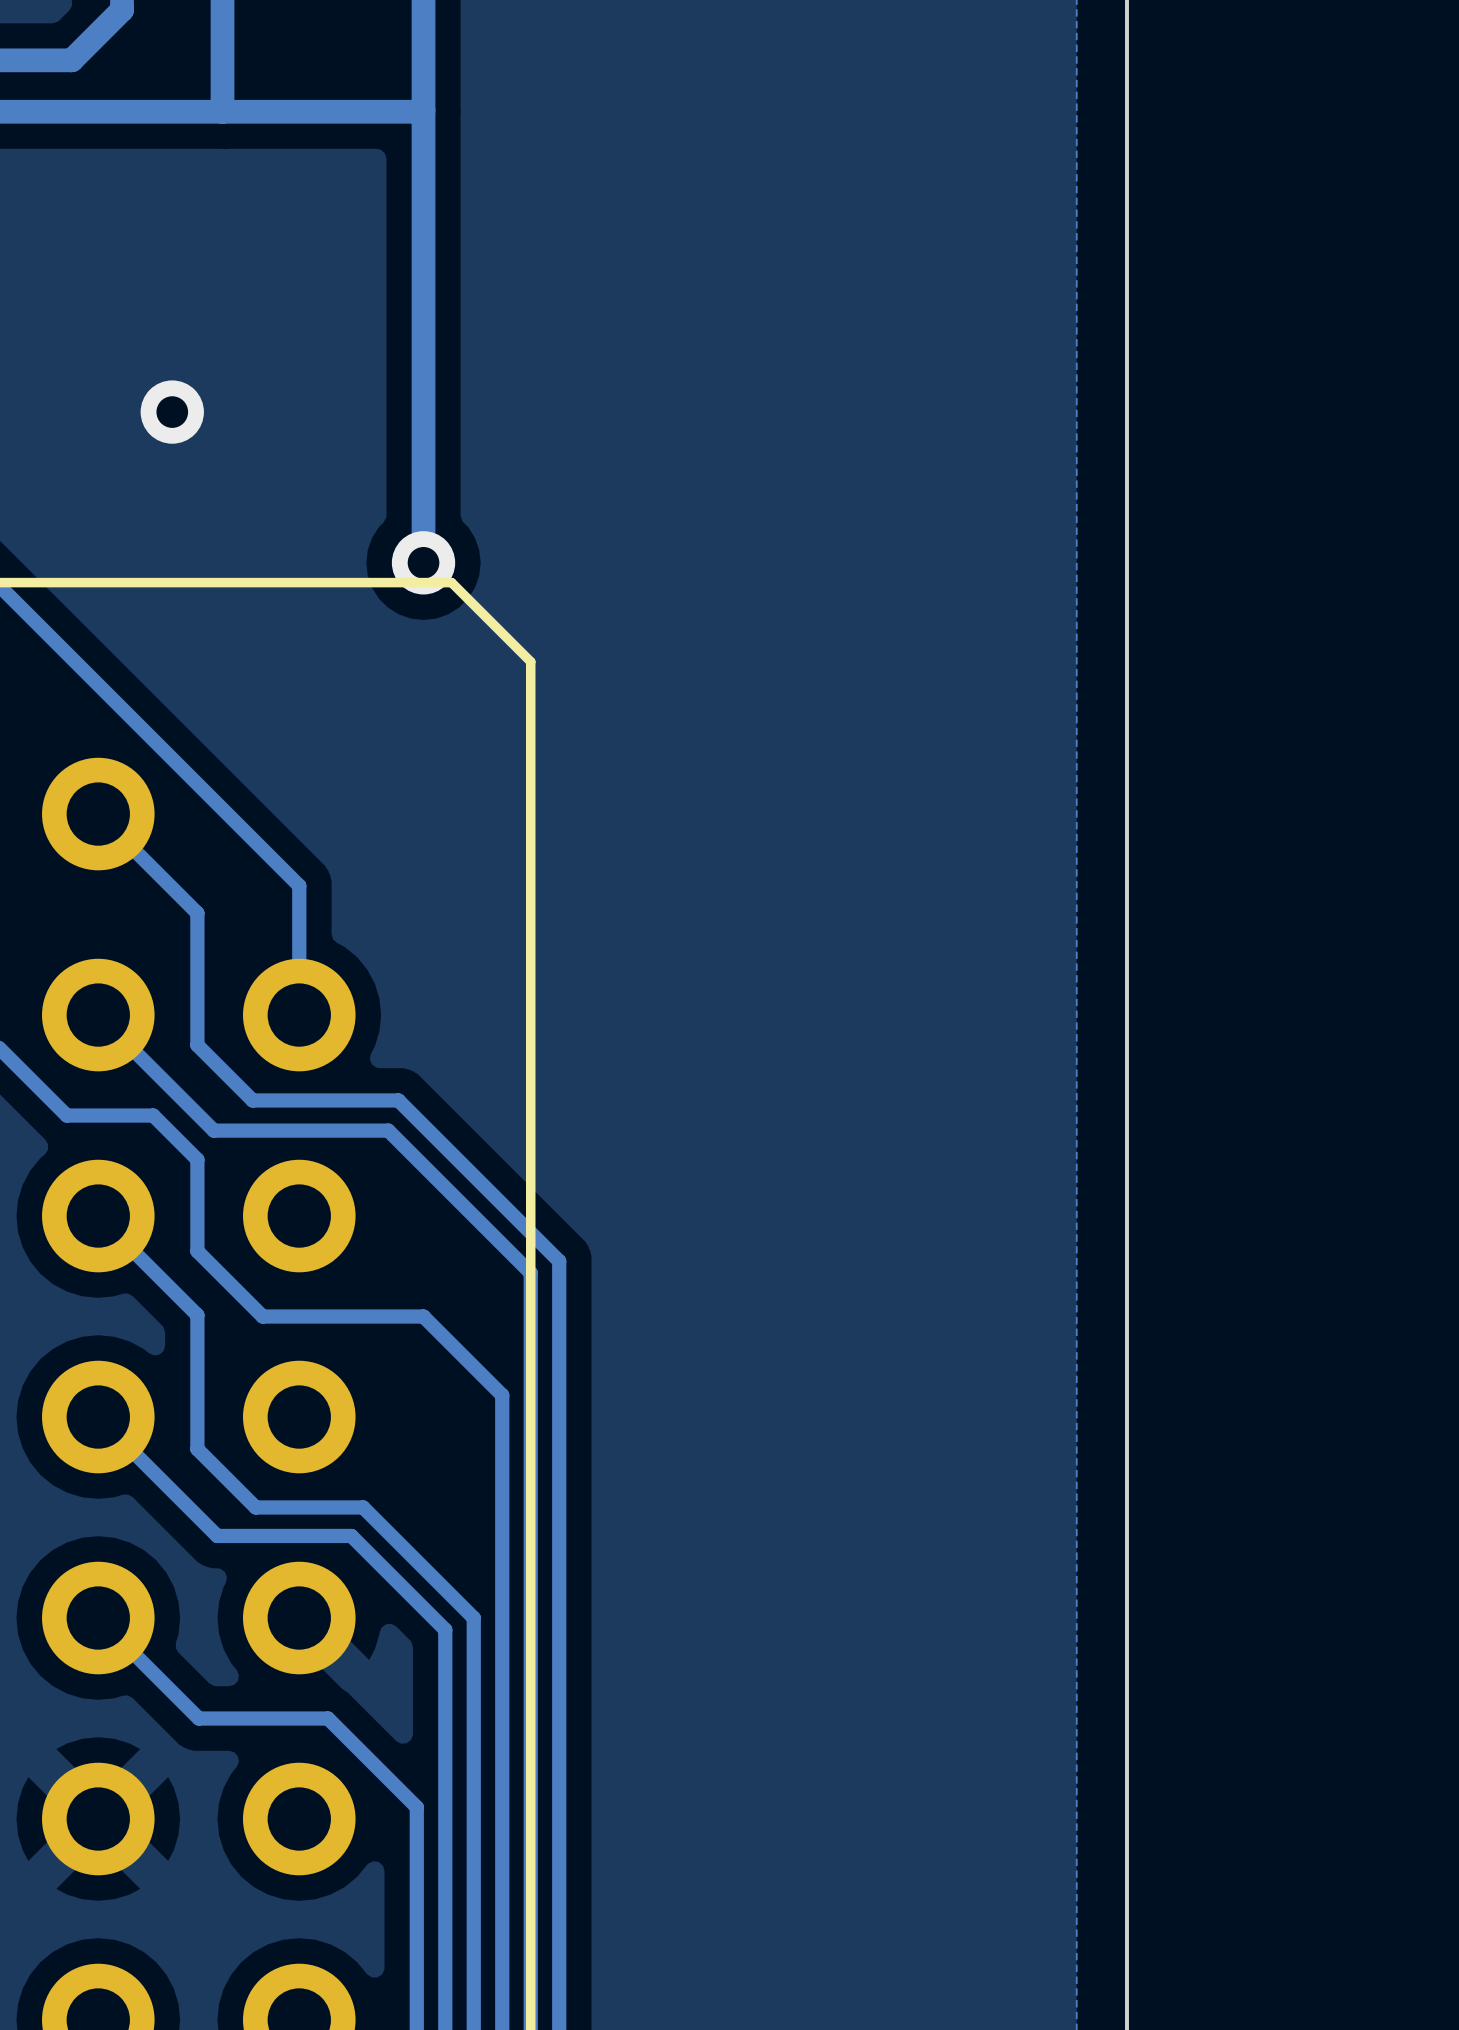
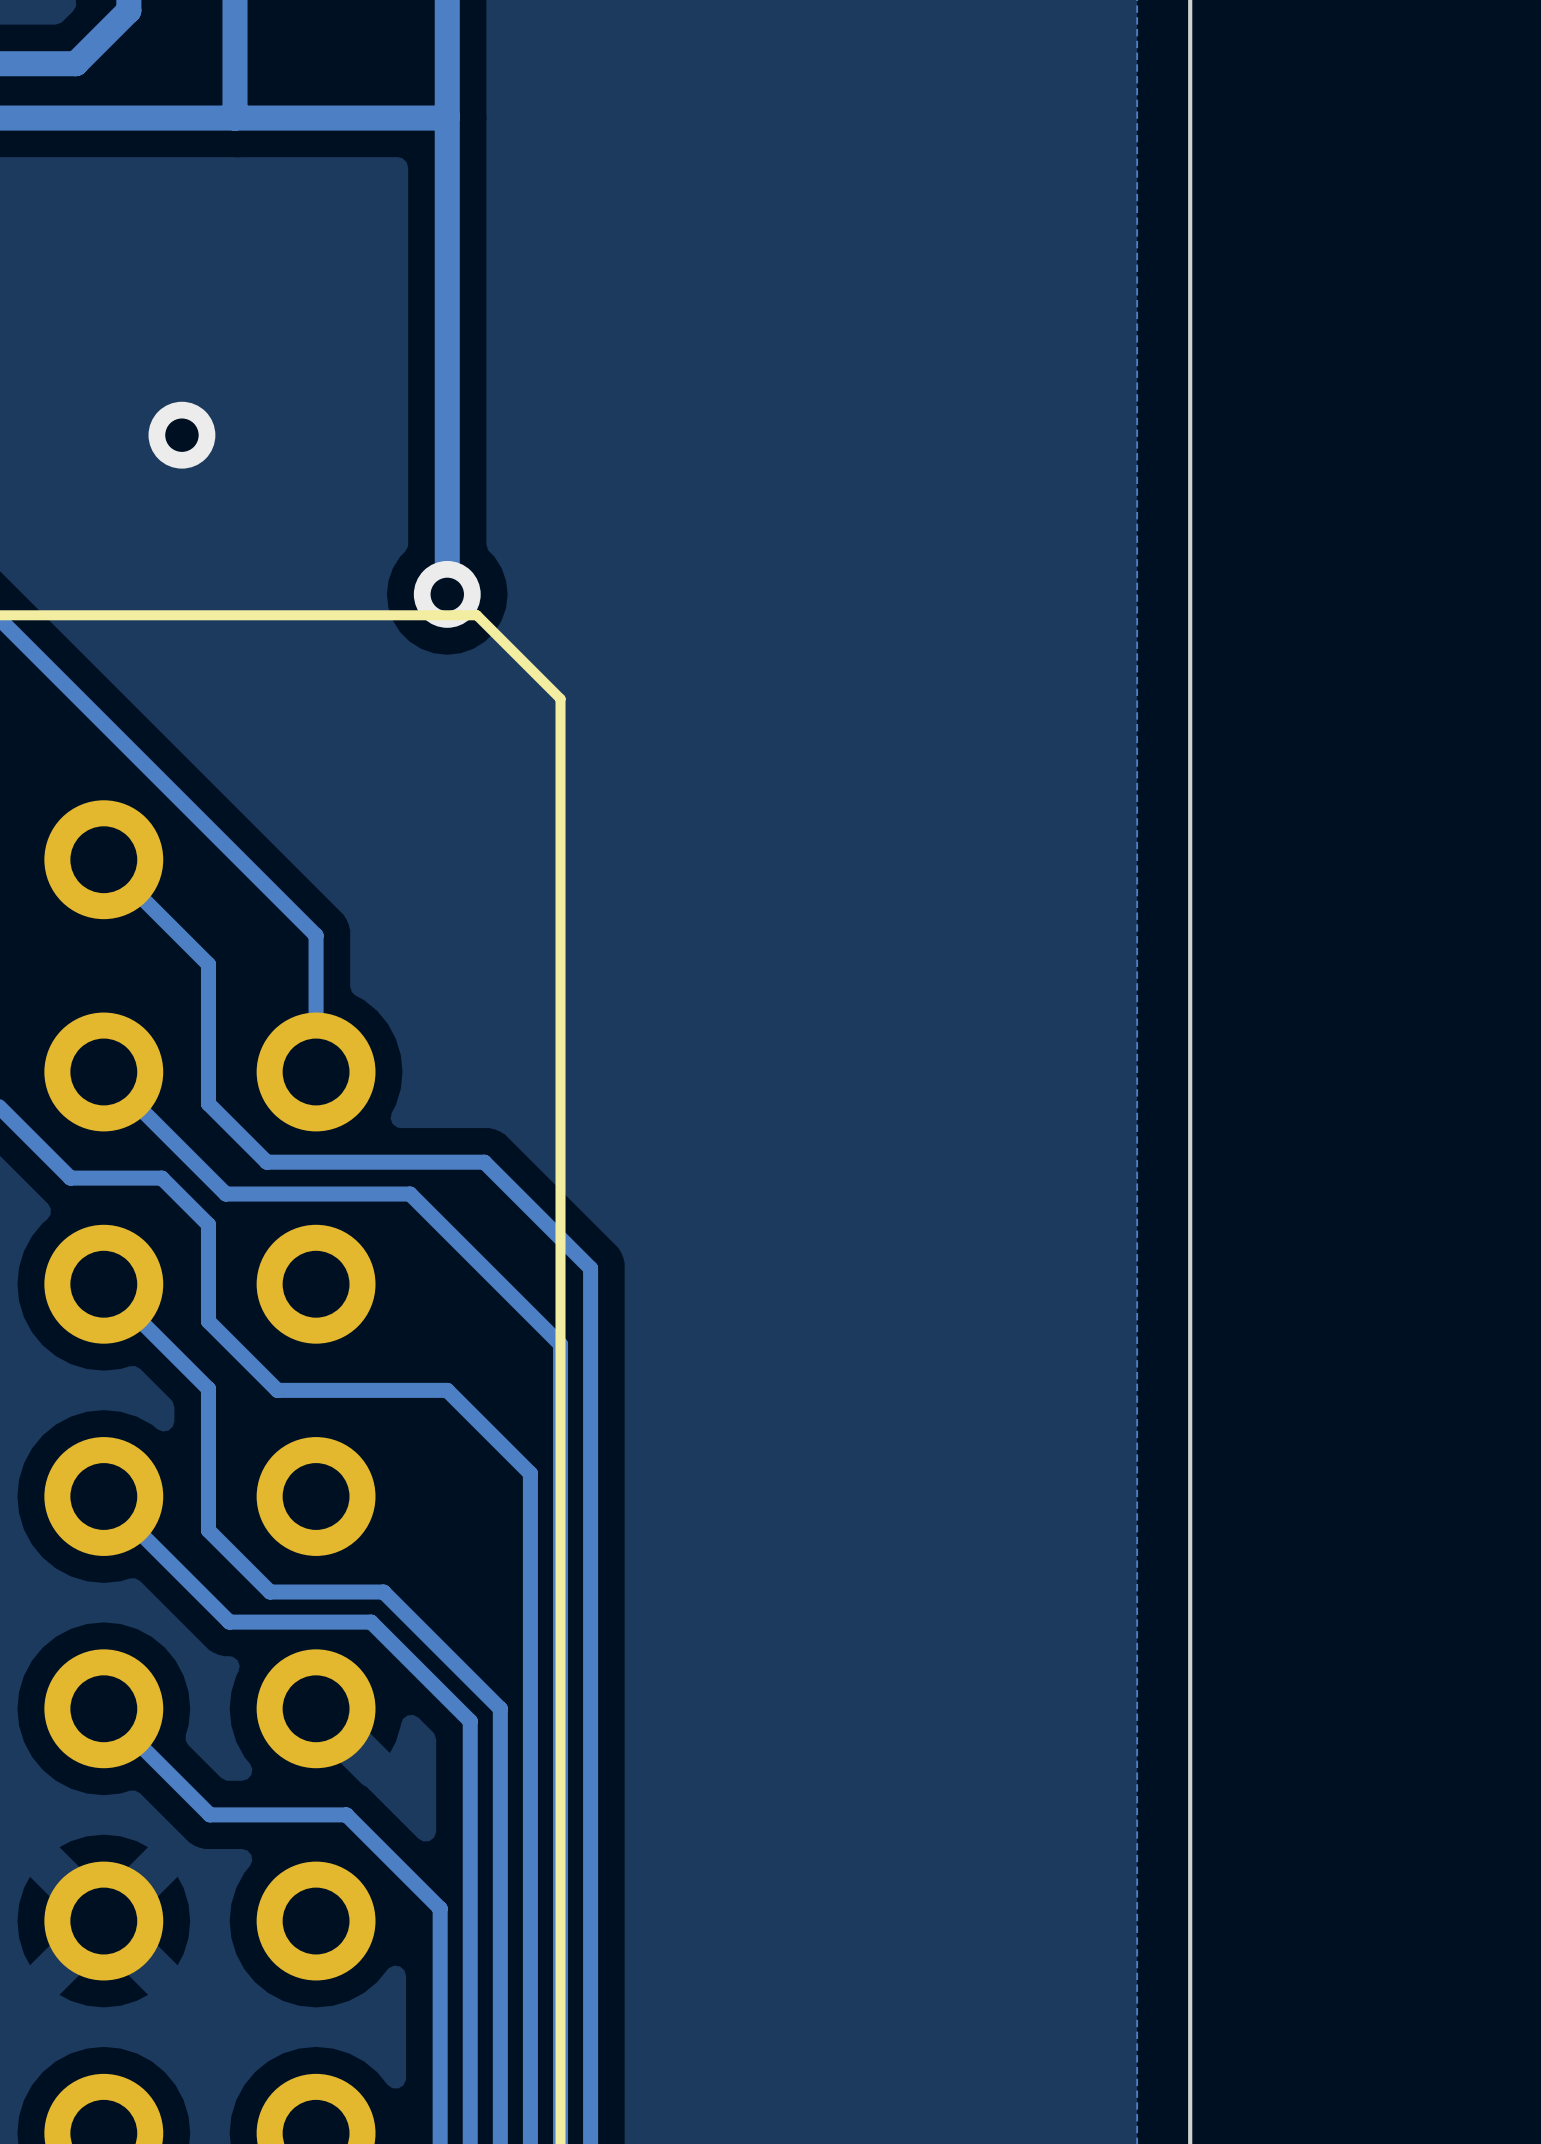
track: (398, 1100) (559, 1261) -> (420, 1162) (484, 1162) (590, 1268) (590, 1331)

